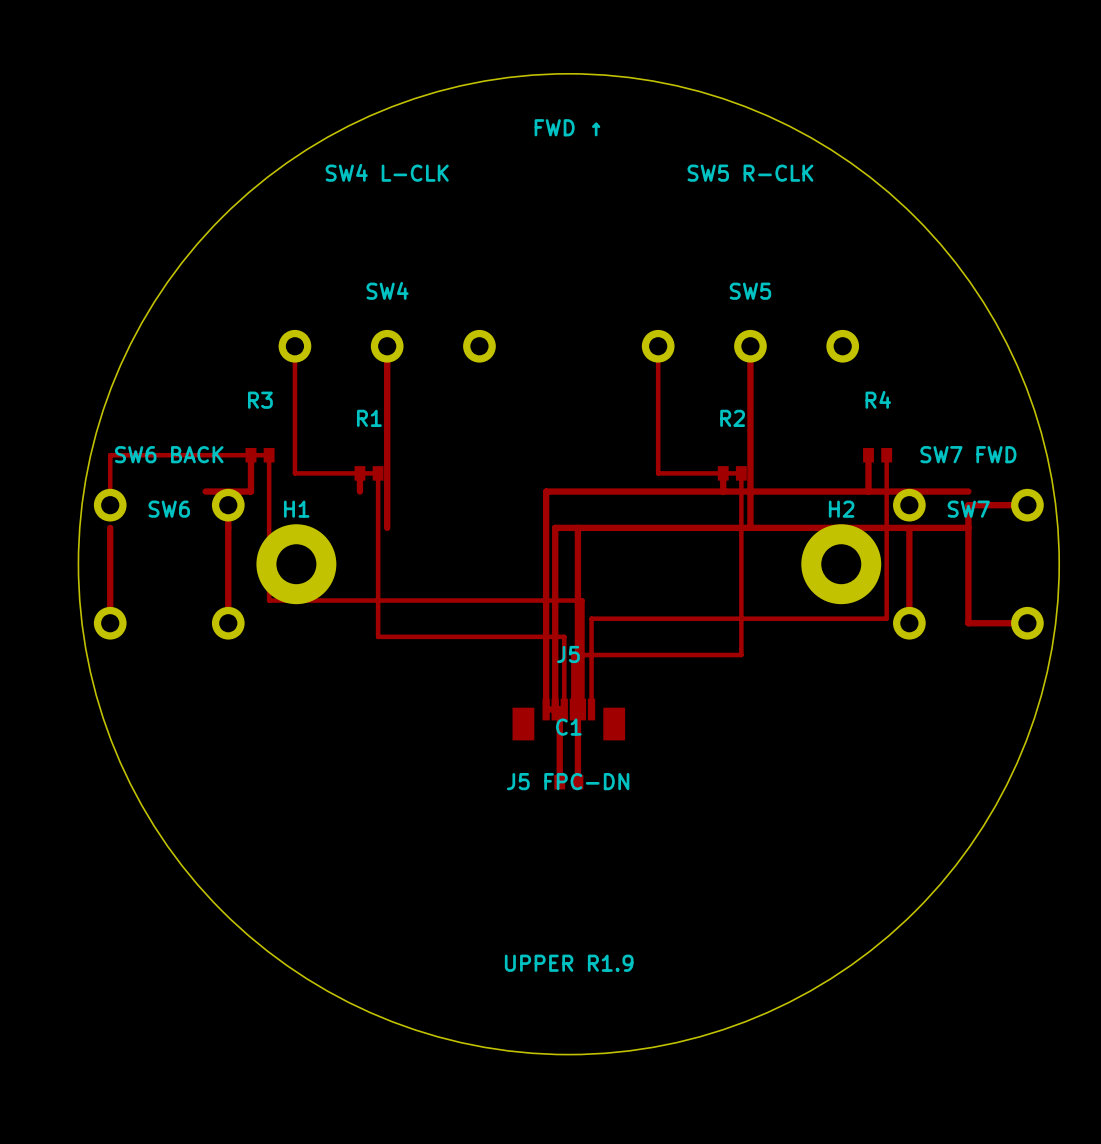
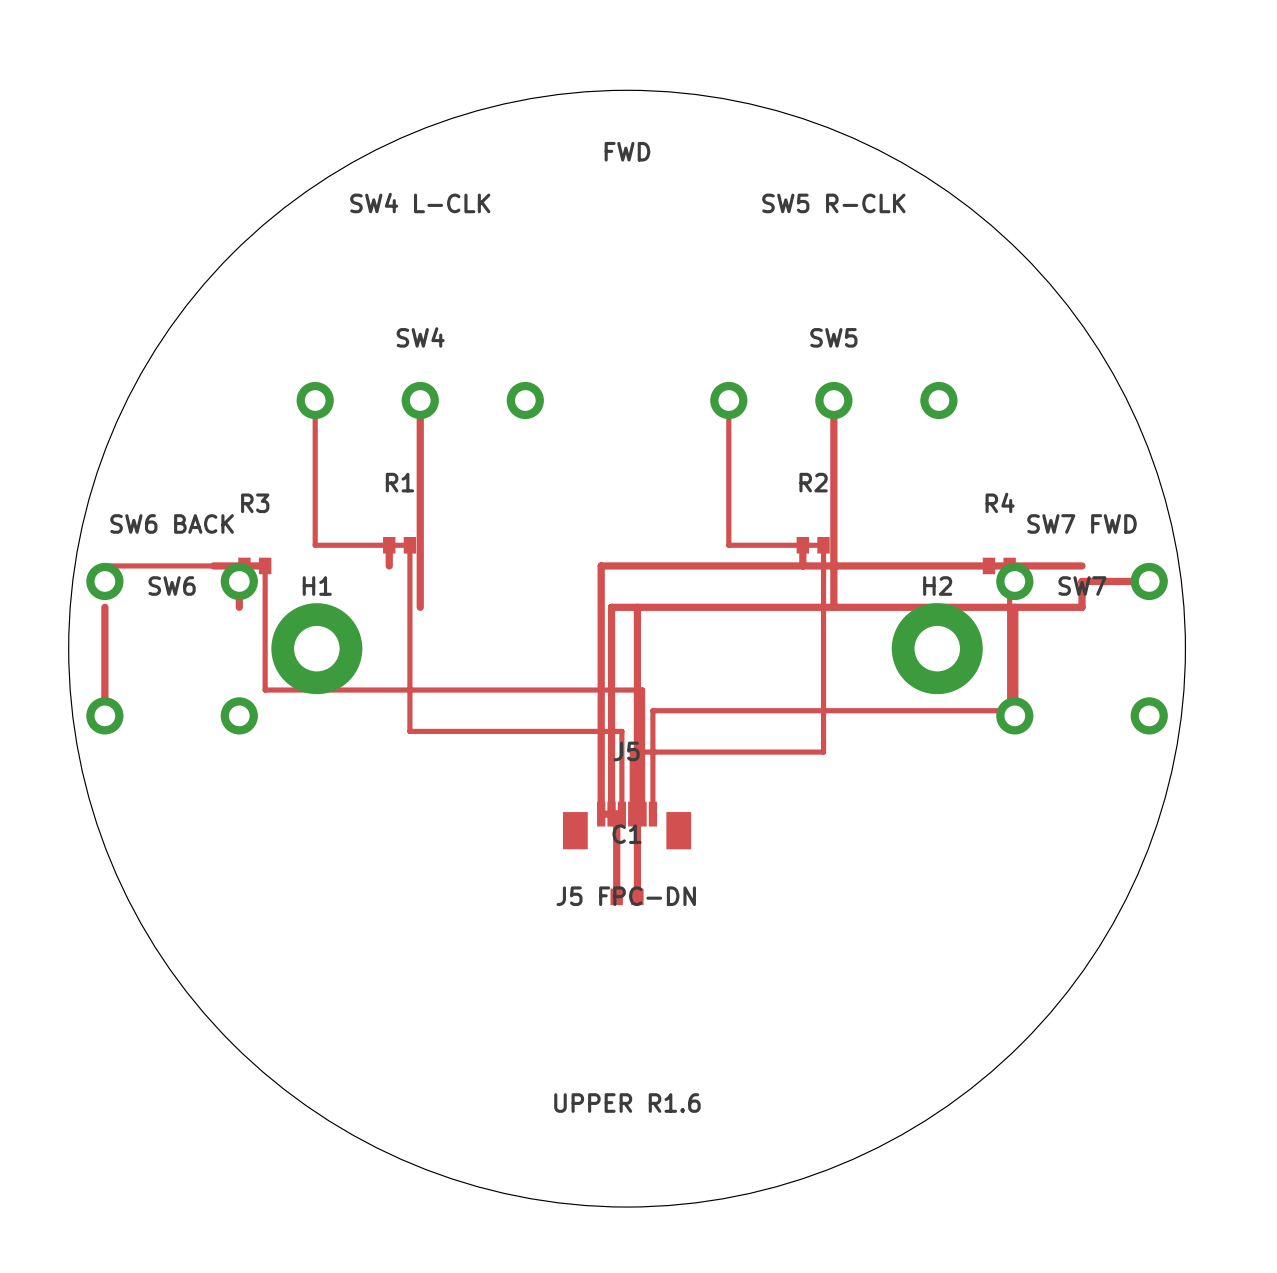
text: FWD ↑ (567, 127) -> FWD (627, 151)
top track: (250, 455) (250, 491) -> (285, 690) (265, 690) (265, 565)
R3 position: (260, 455) -> (254, 565)
top track: (868, 455) (868, 491) -> none
R4 position: (877, 455) -> (999, 565)
top track: (886, 455) (886, 618) -> (1009, 565) (1009, 710) (988, 710)
top track: (110, 491) (110, 455) (269, 455) (269, 600) -> (104, 565) (244, 565)
top track: (228, 527) (228, 623) -> none
top track: (968, 527) (968, 623) (1027, 623) -> none
text: UPPER R1.9 (569, 963) -> UPPER R1.6 (627, 1103)

